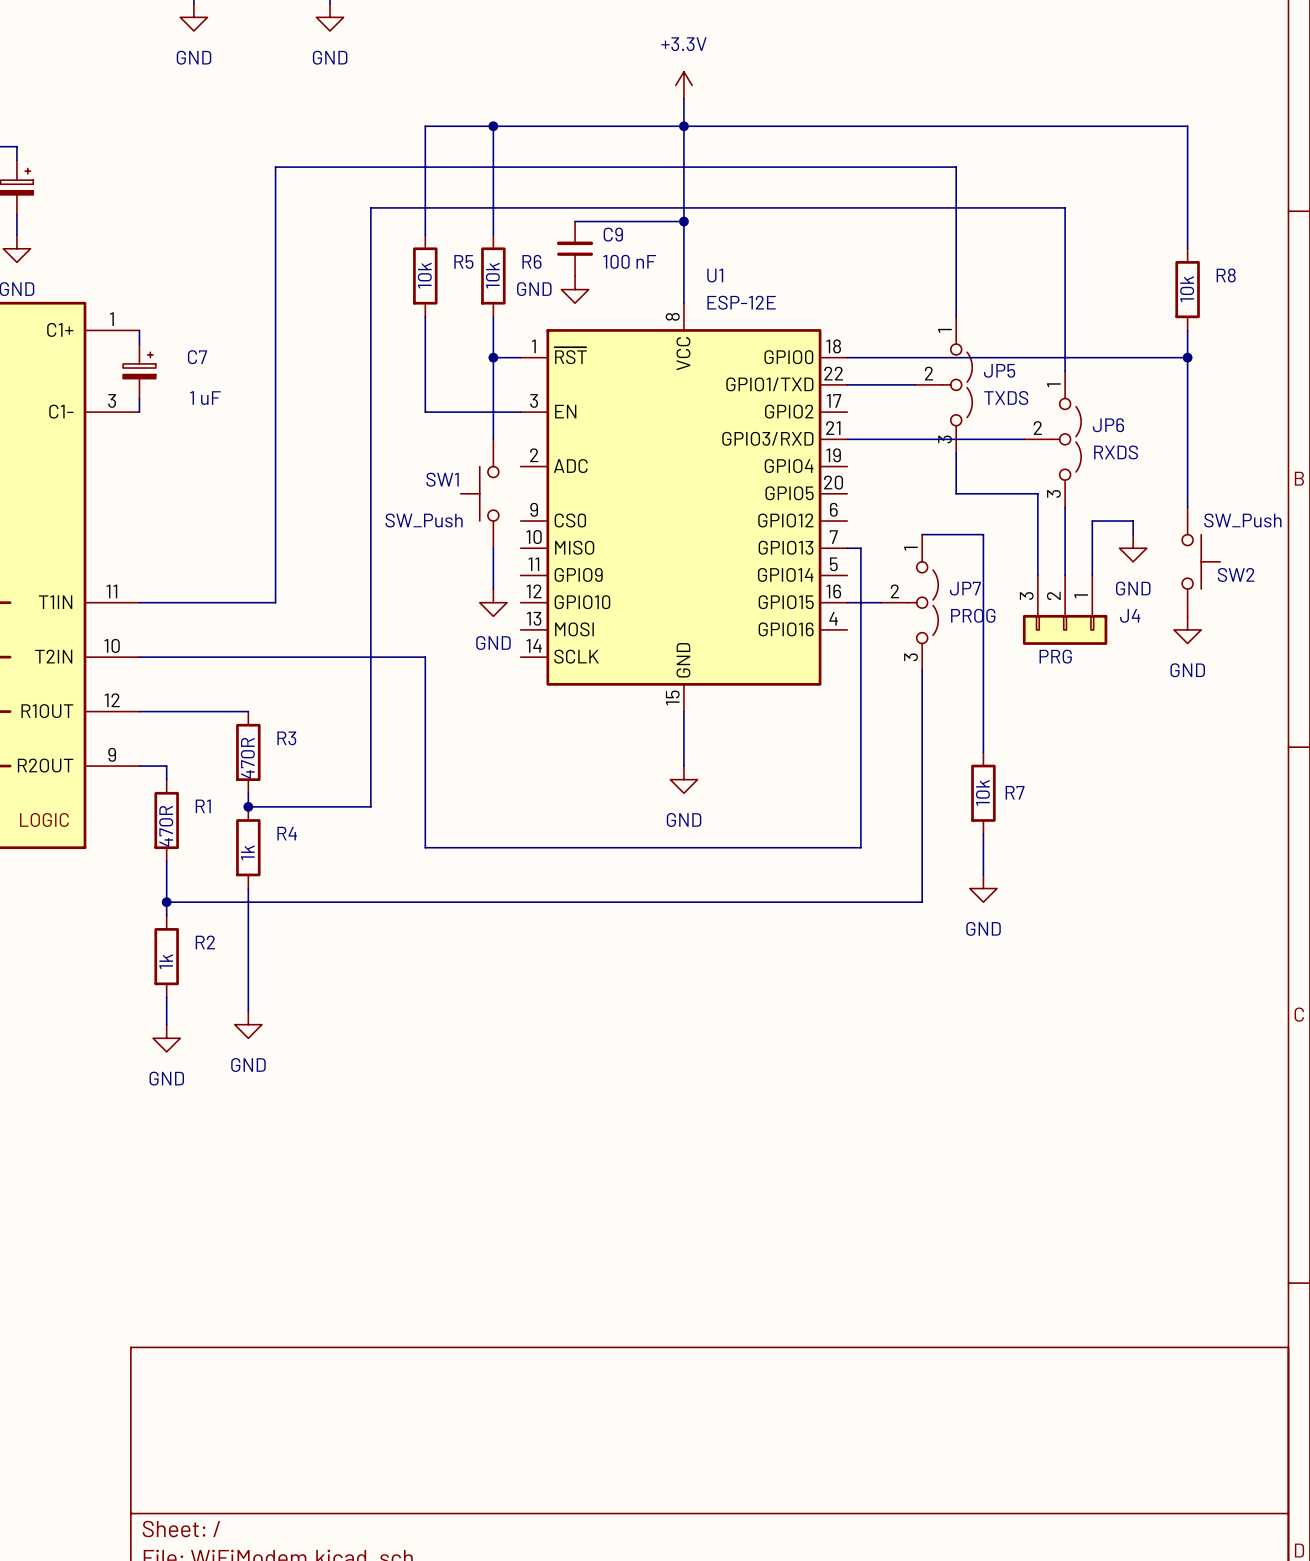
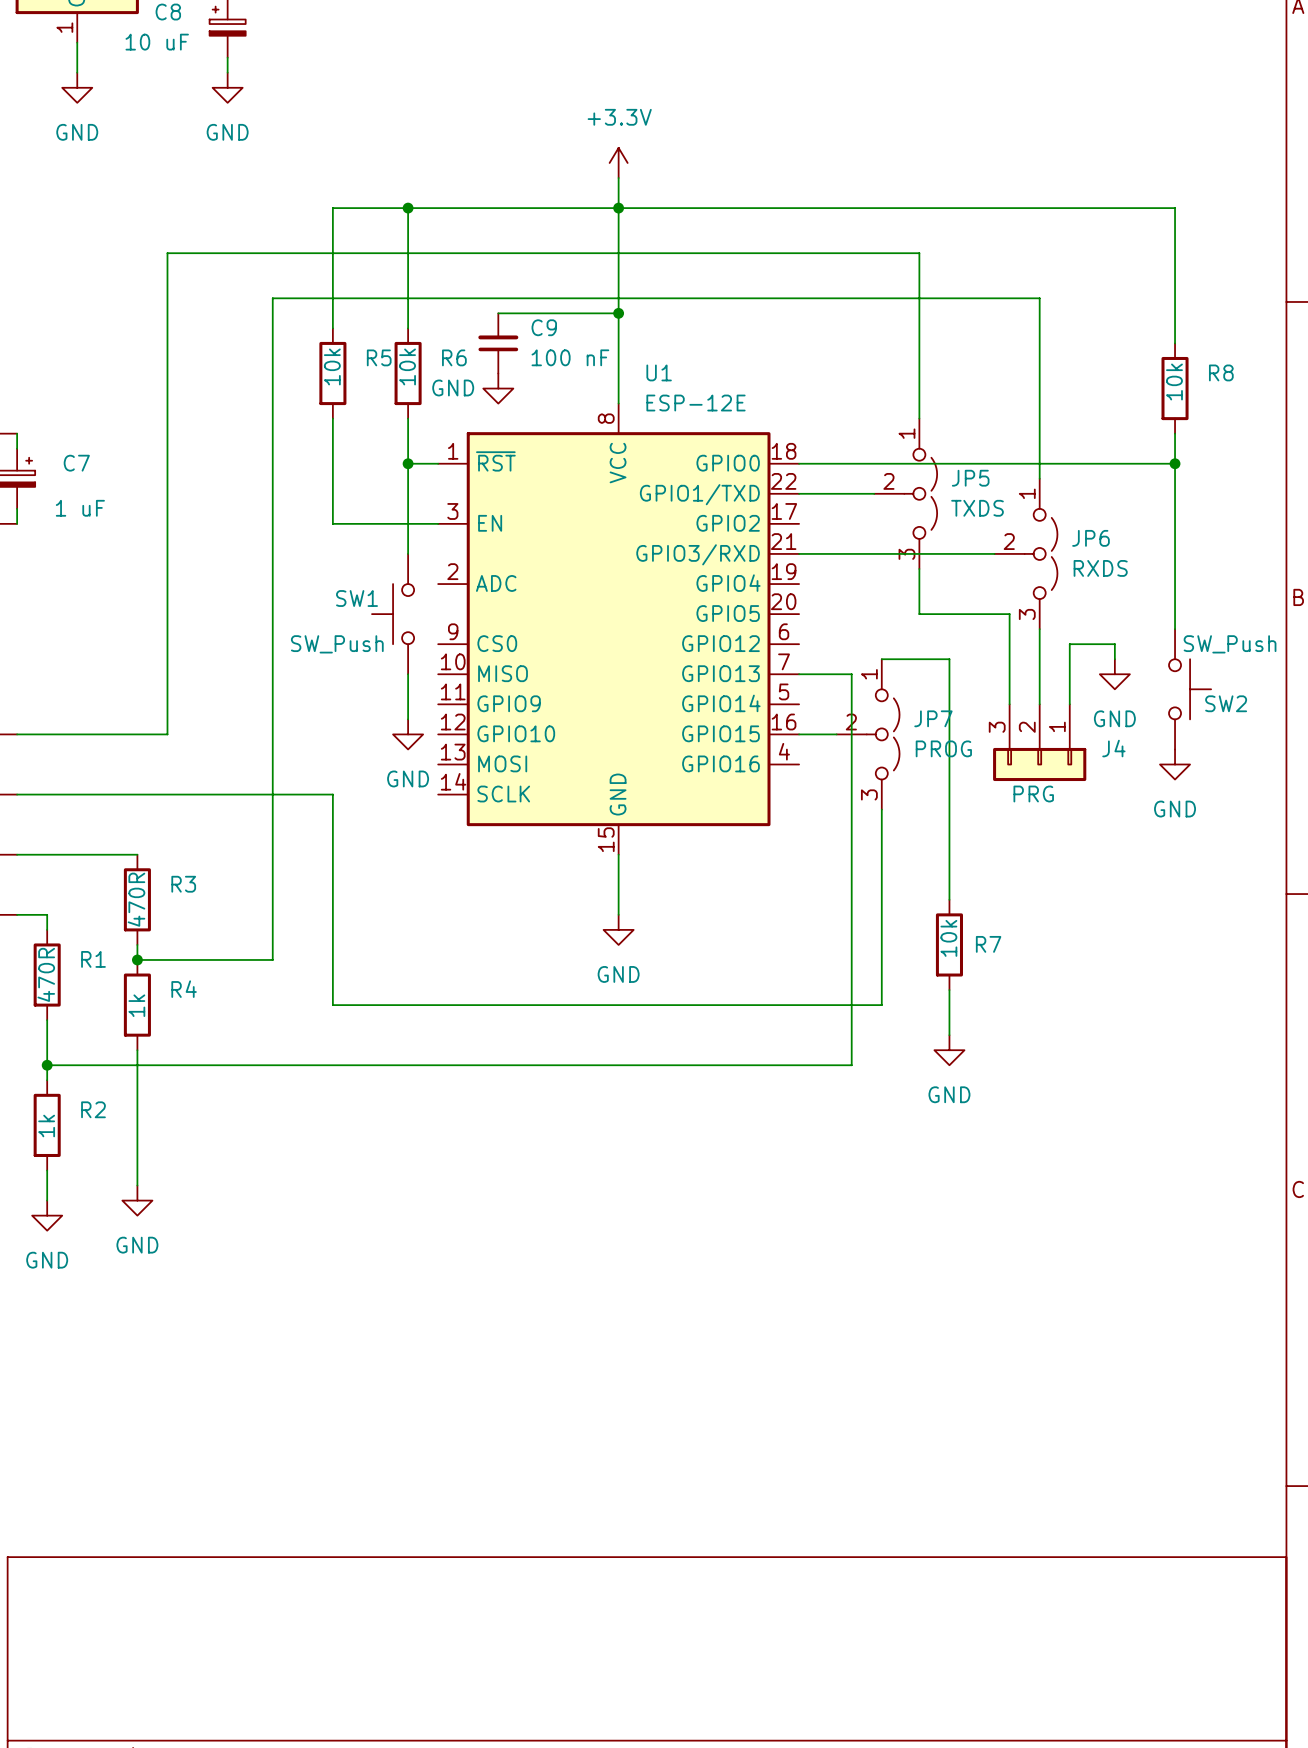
wire: (860, 548) (860, 847) -> (814, 674) (851, 674) (851, 1065)
wire: (922, 847) (922, 902) (894, 902) -> (881, 1005) (814, 1005)

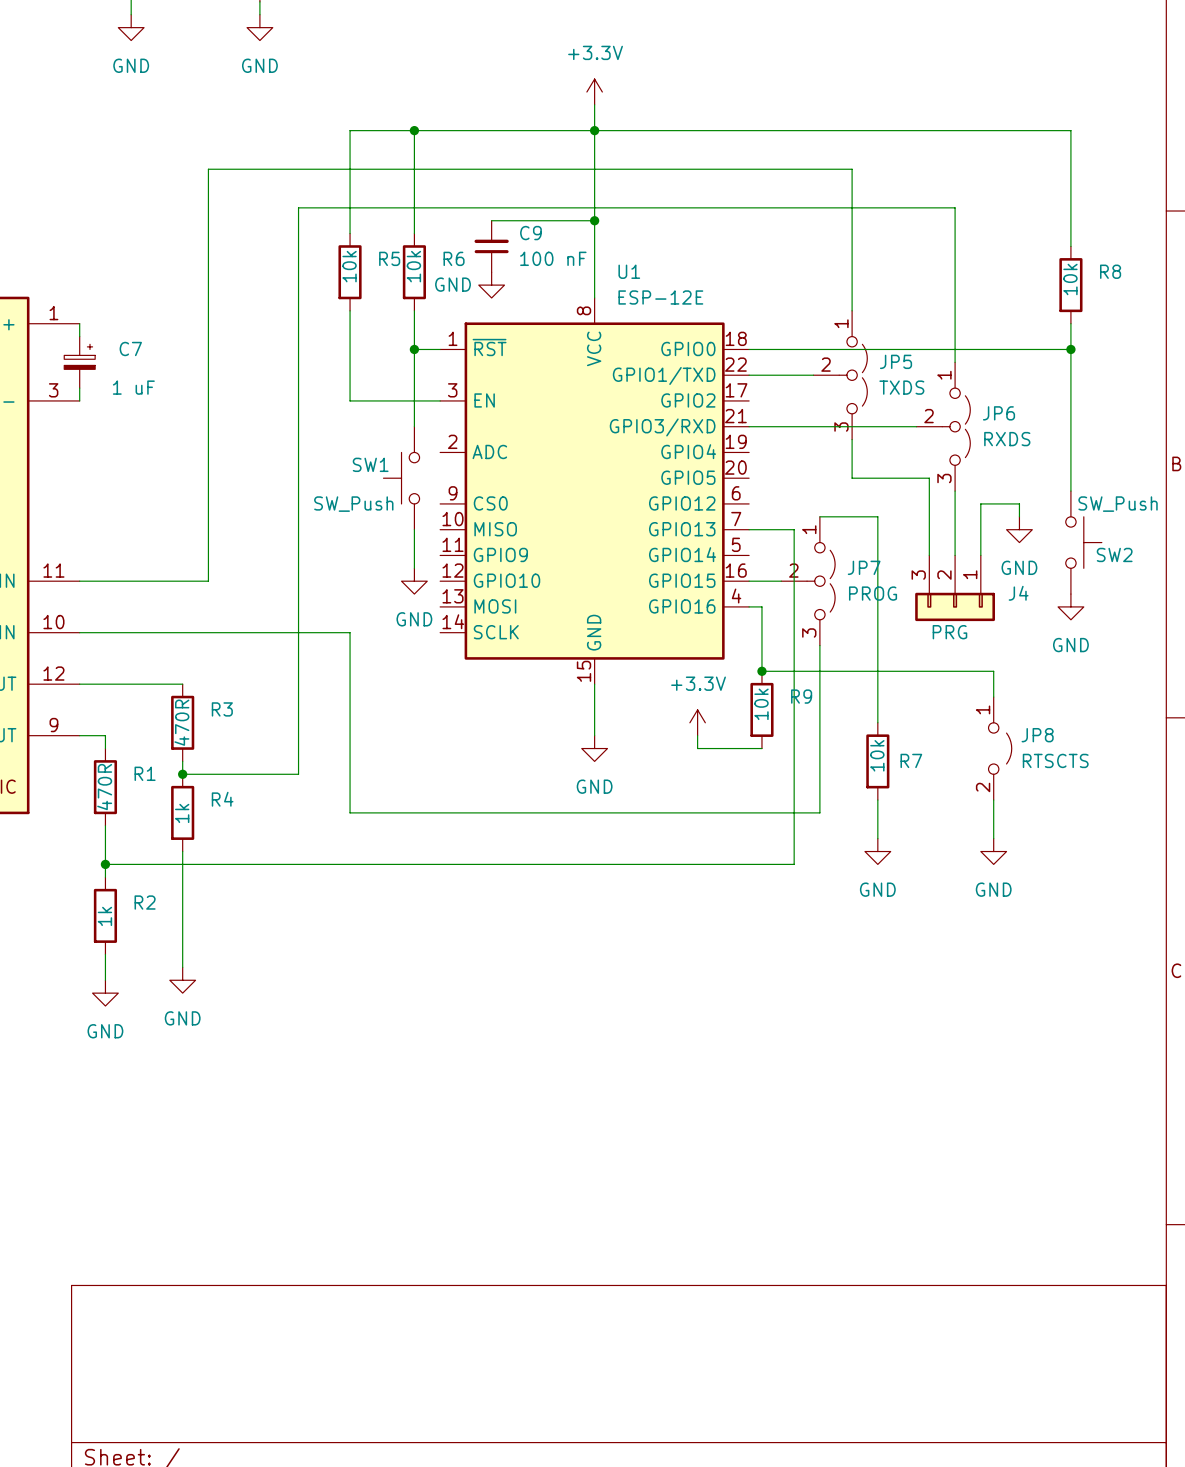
wire: none -> (749, 606) (761, 606) (761, 671) (993, 671) (993, 697)
junction: none -> (761, 671)
R9: none -> 10k (761, 709)
power symbol: none -> +3.3V (697, 722)
wire: none -> (697, 735) (697, 748) (761, 748)
JP8: none -> RTSCTS (1000, 748)
wire: none -> (993, 800) (993, 838)
power symbol: none -> GND (993, 851)

